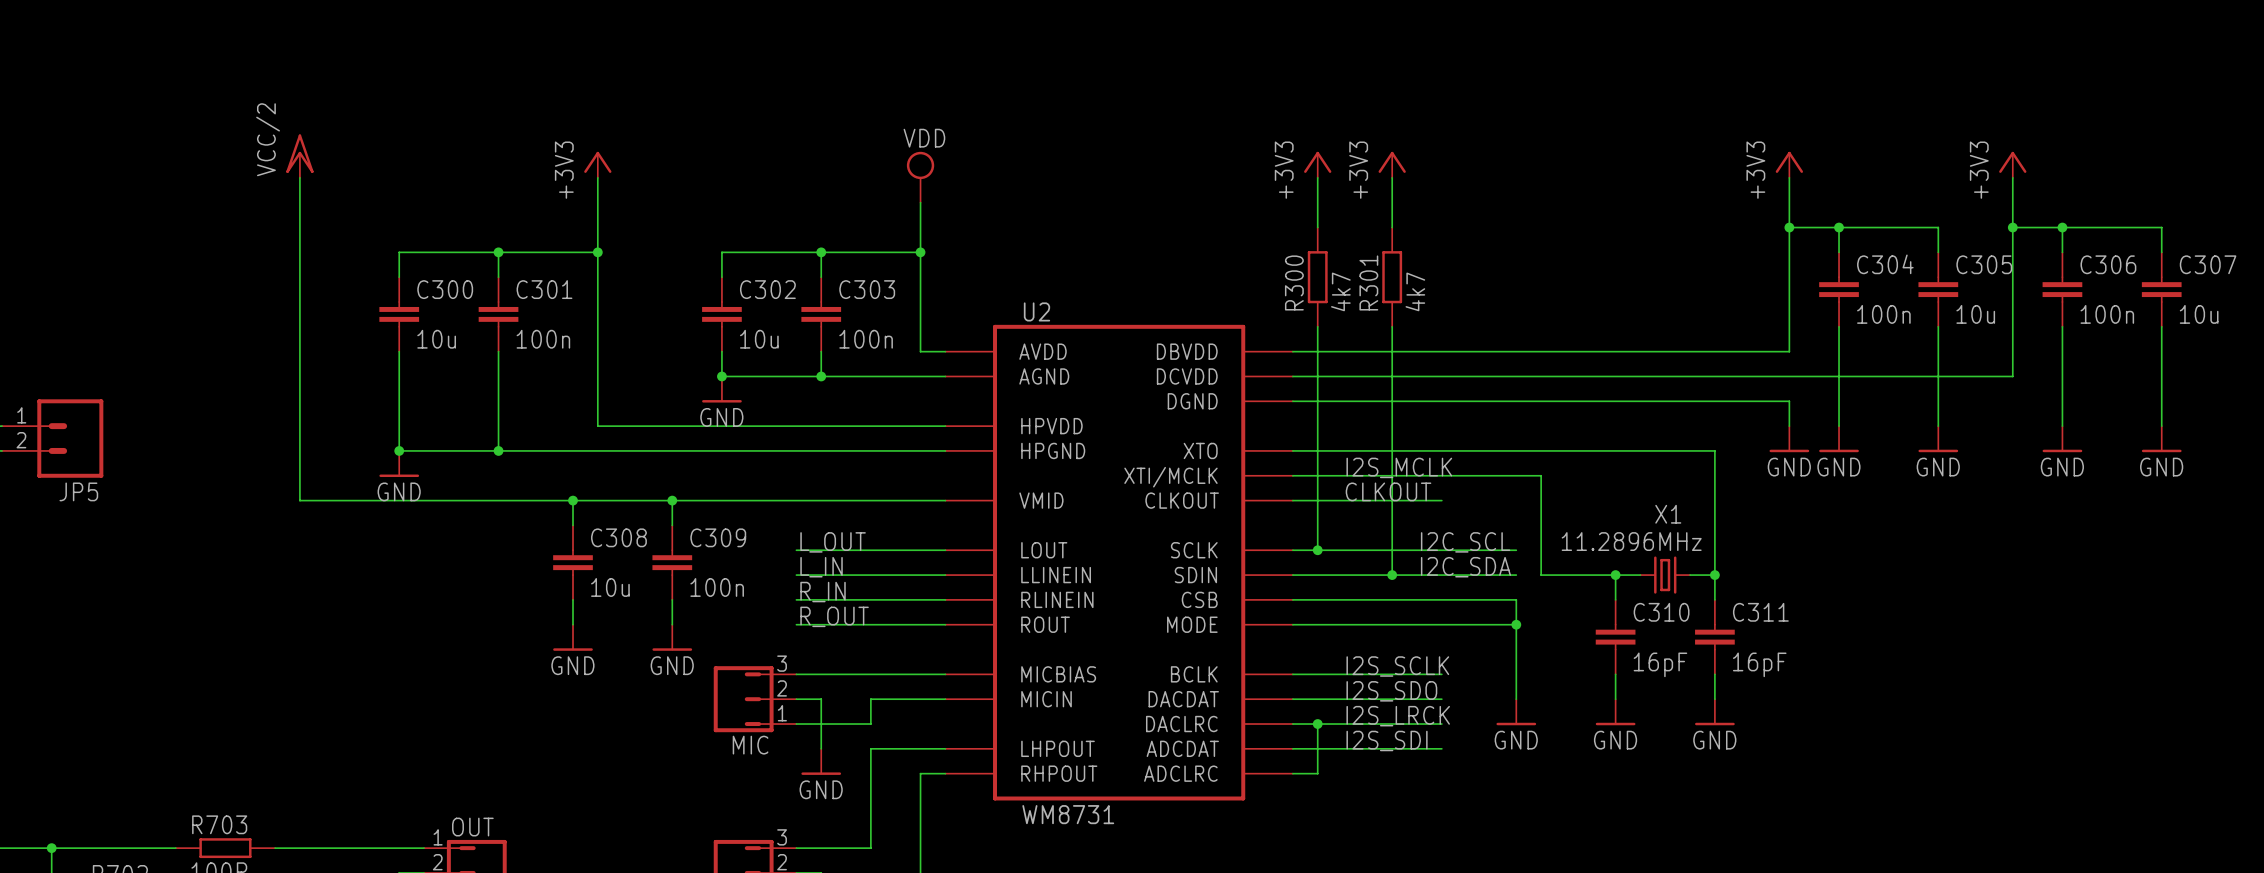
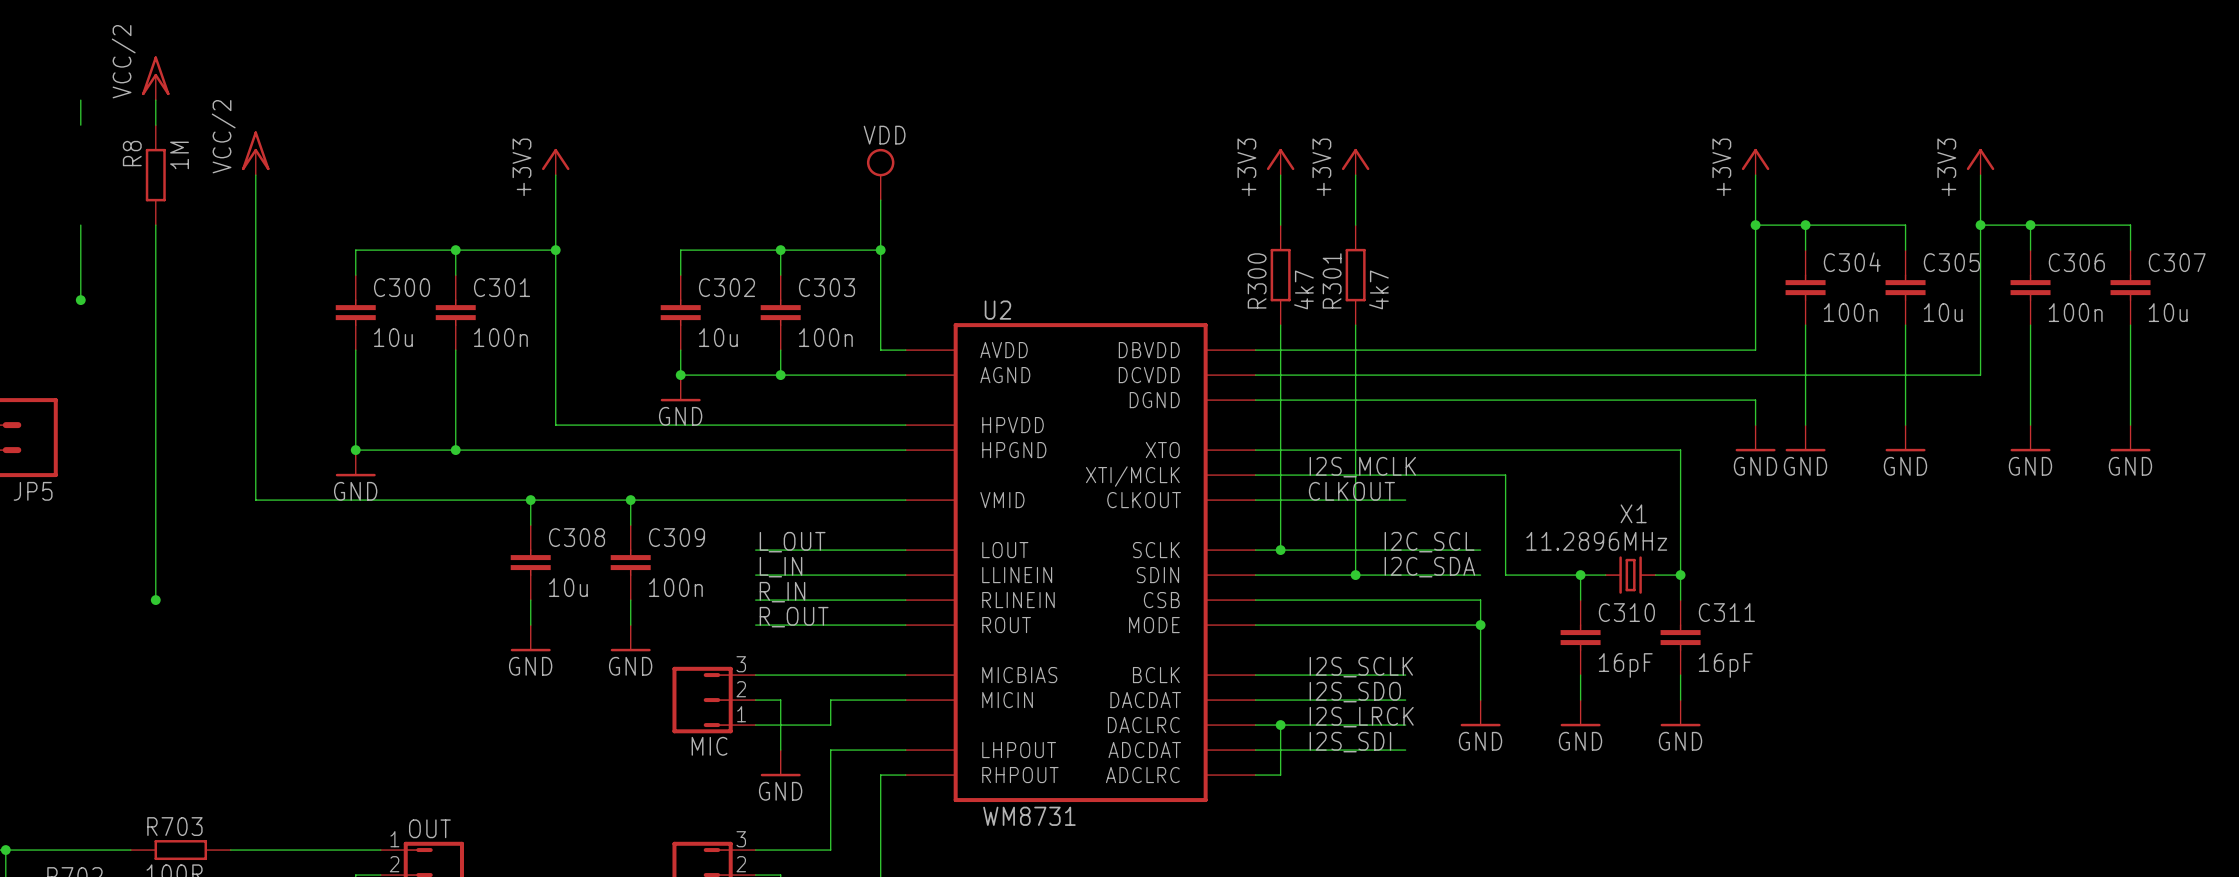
power symbol: none -> VCC/2 (155, 78)
wire: none -> (80, 100) (80, 125)
wire: none -> (155, 100) (155, 125)
R8: none -> 1M (155, 175)
wire: none -> (80, 225) (80, 300)
wire: none -> (155, 225) (155, 600)
junction: none -> (80, 300)
junction: none -> (155, 600)

